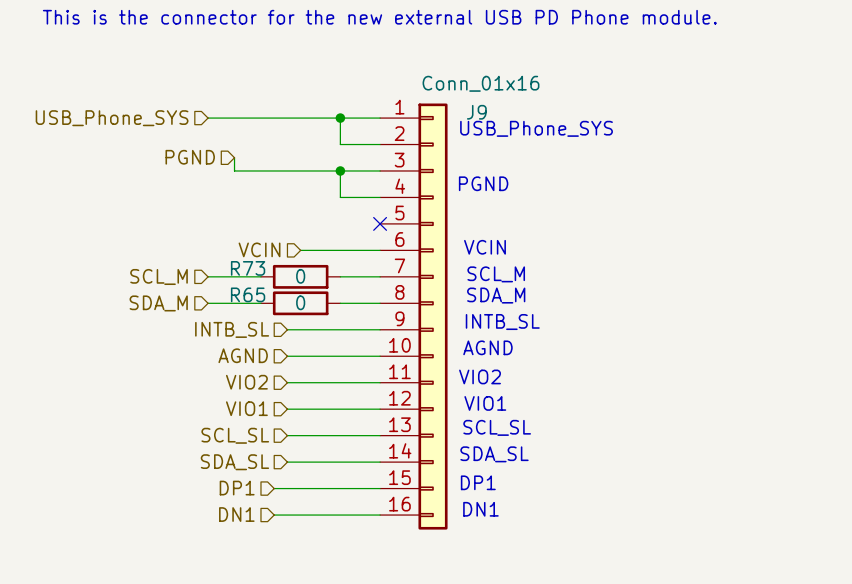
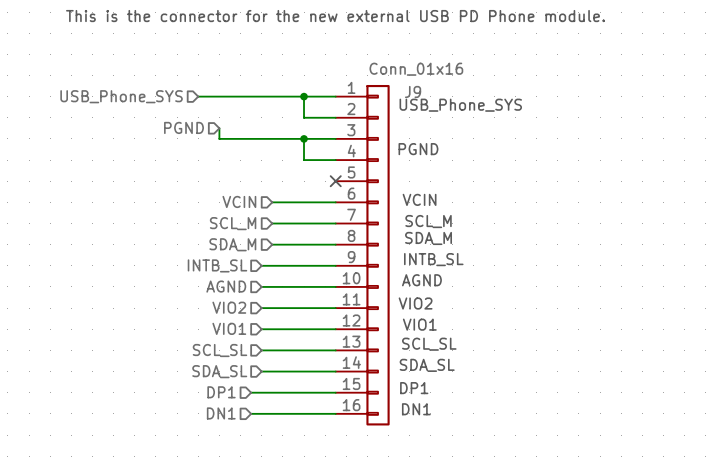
hierarchical label position: SCL_M (159, 276) -> SCL_M (233, 223)
wire: (208, 276) (260, 276) -> none
wire: none -> (272, 223) (304, 223)
R73: 0 (300, 276) -> none
hierarchical label position: SDA_M (158, 303) -> SDA_M (232, 244)
wire: (208, 303) (260, 303) -> none
wire: none -> (272, 244) (304, 244)
R65: 0 (300, 303) -> none

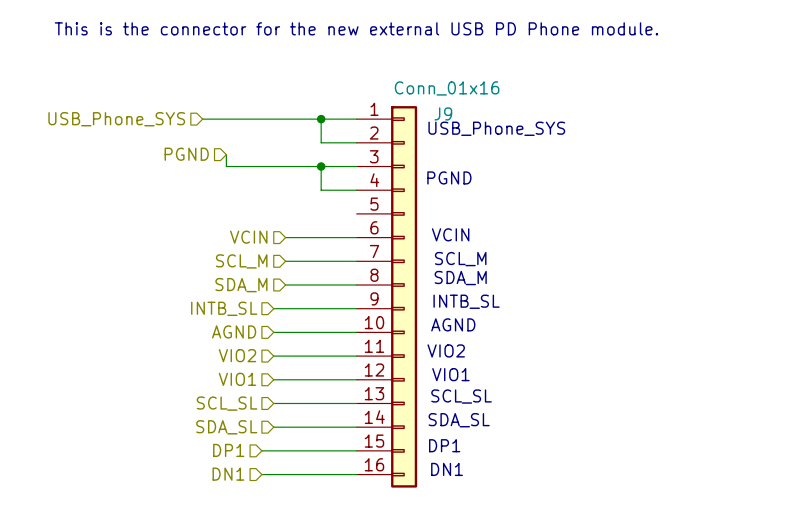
no-connect mark: (335, 181) -> none

